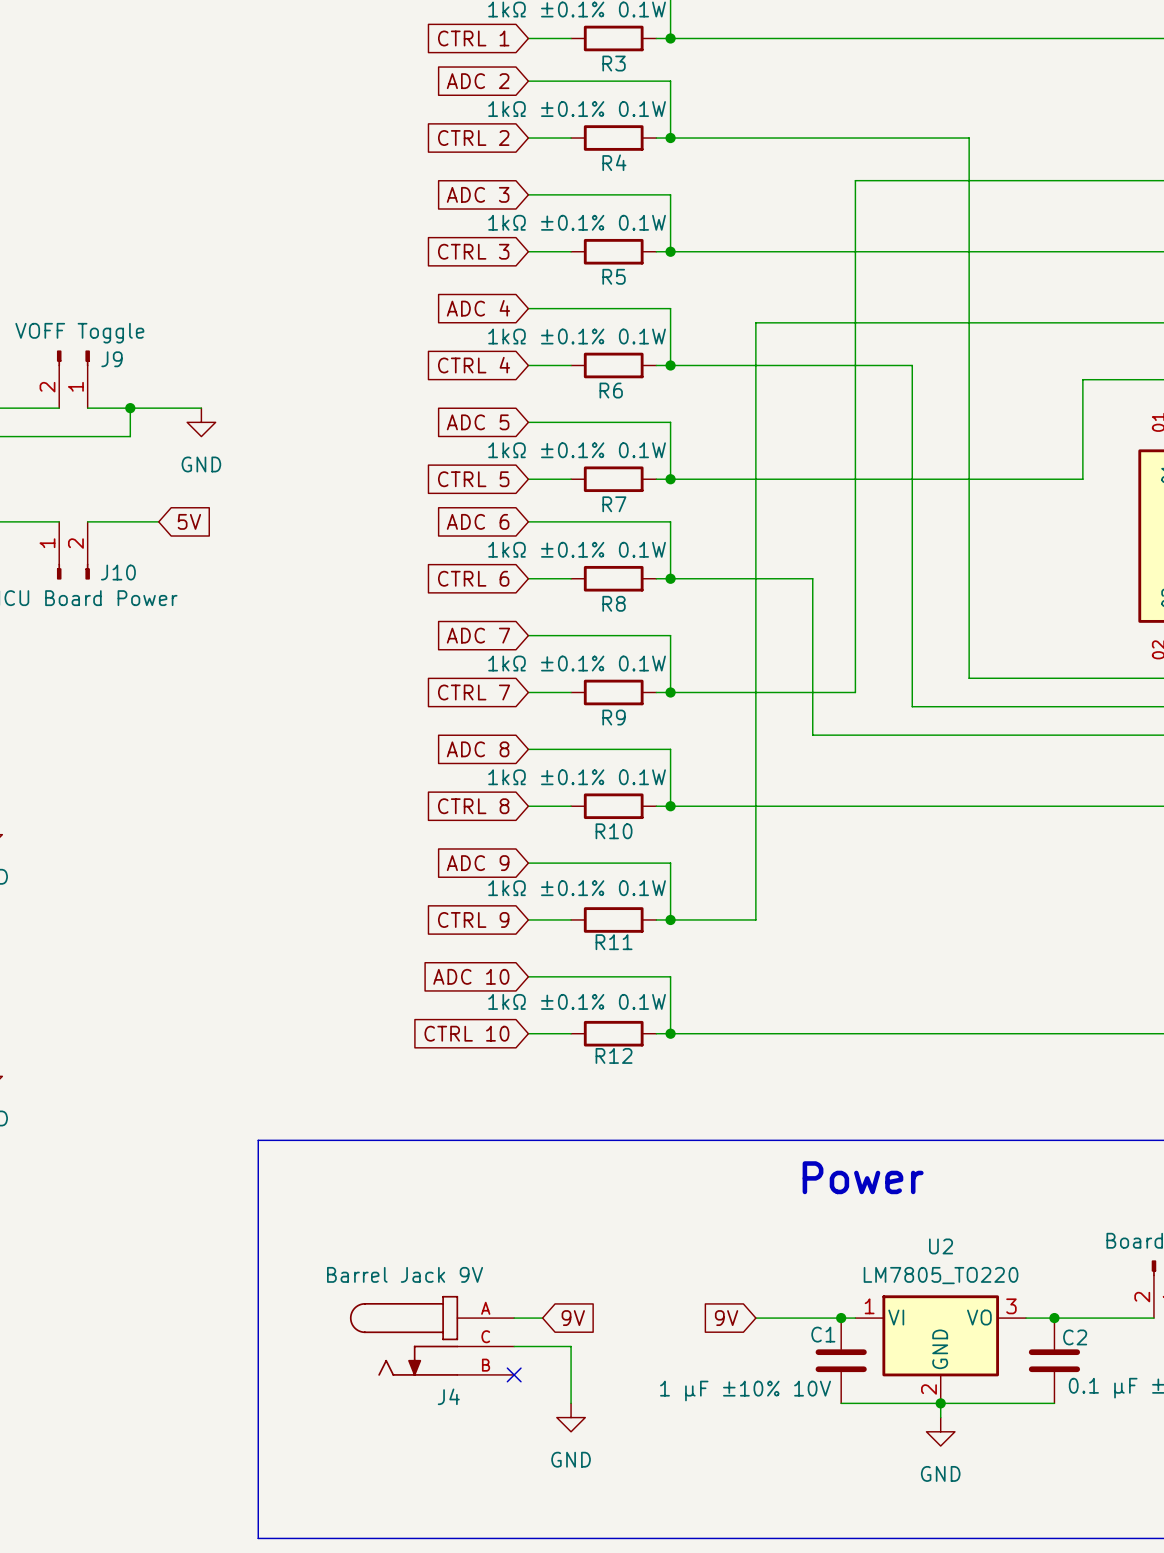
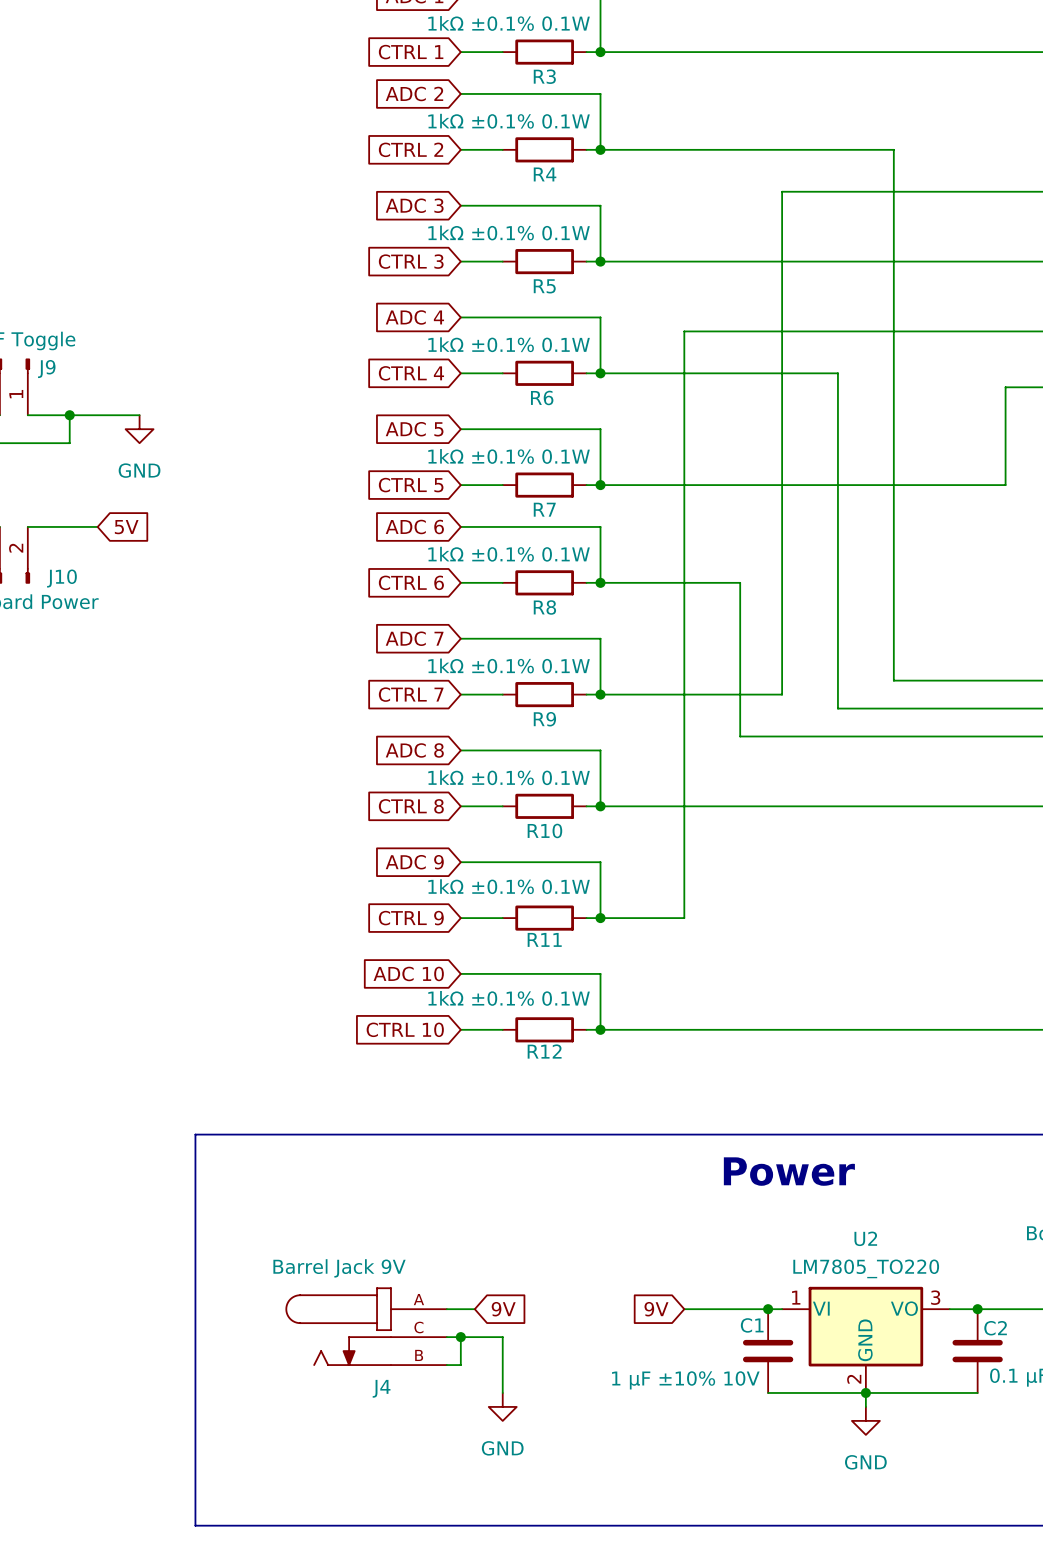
wire: none -> (460, 1337) (460, 1365) (446, 1365)
junction: none -> (460, 1337)
no-connect mark: (514, 1374) -> none

